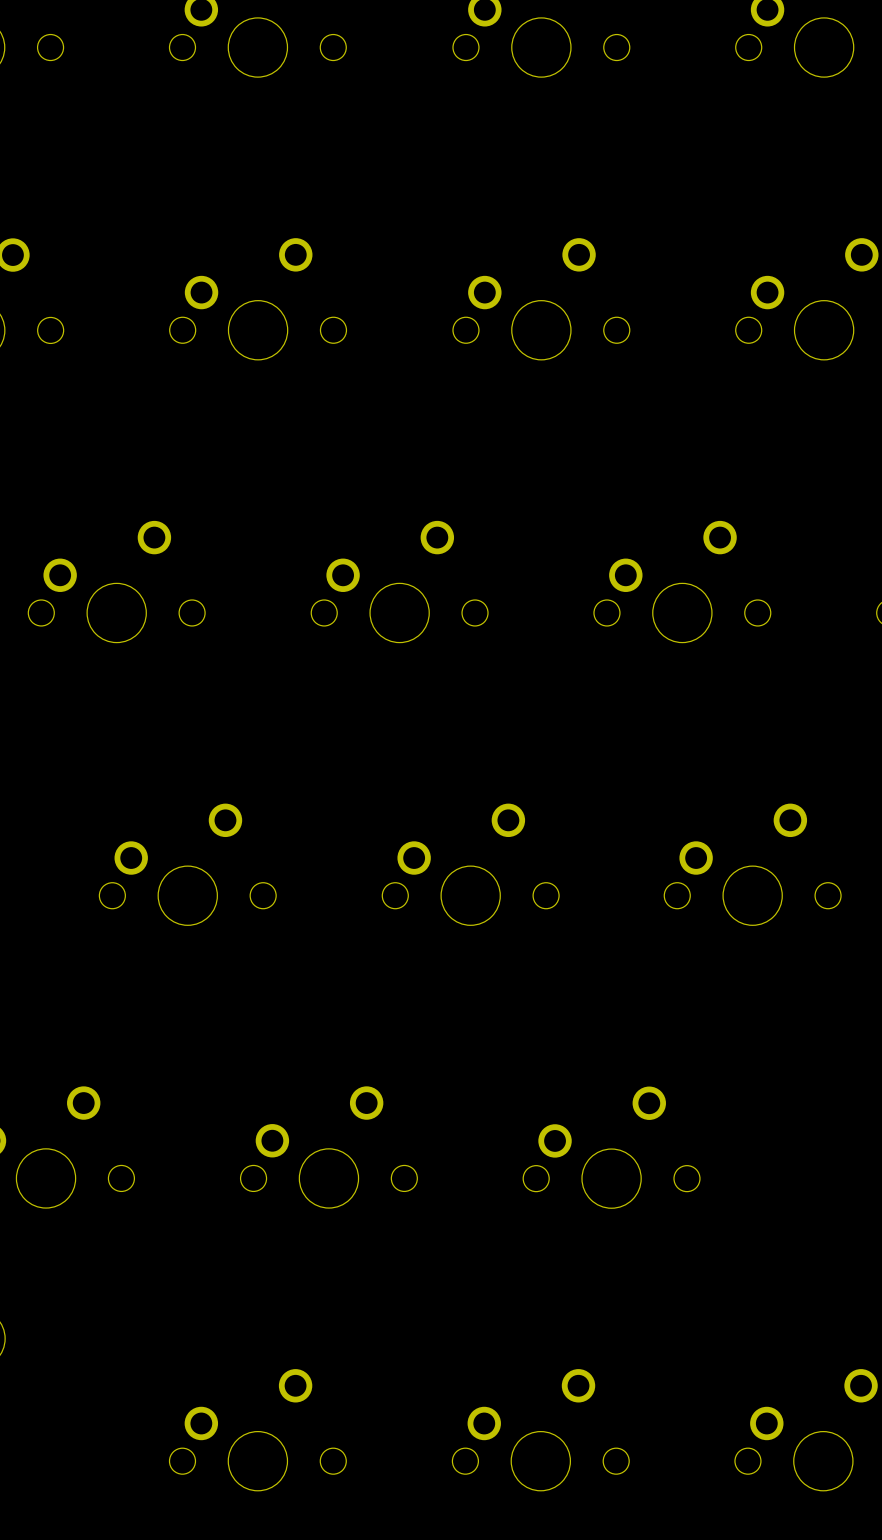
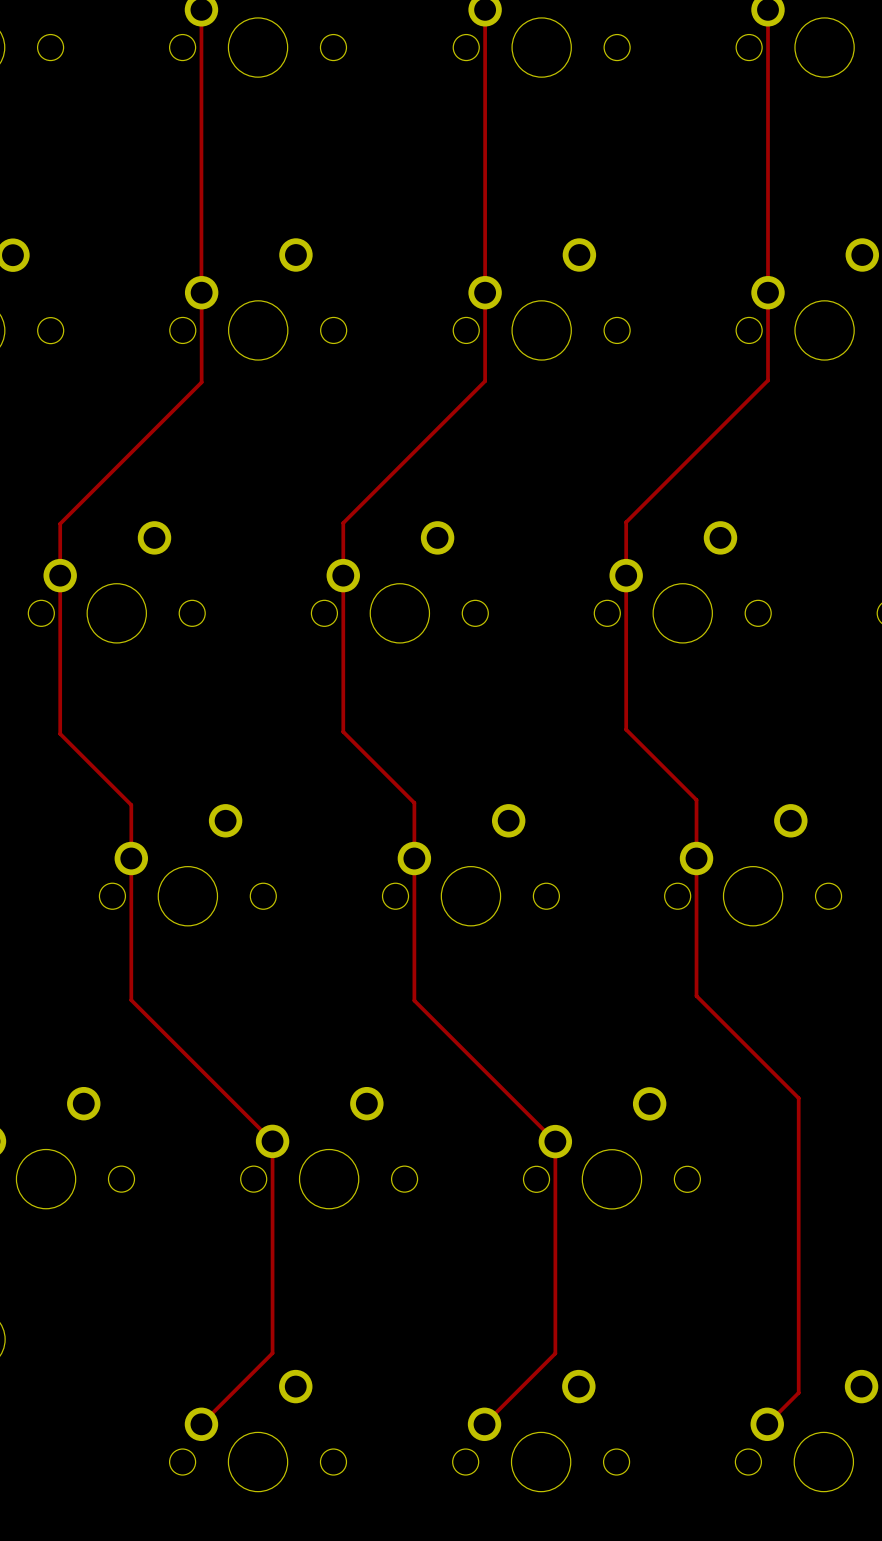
track: none -> (201, 9) (201, 292)
track: none -> (485, 9) (485, 381) (343, 523) (343, 731) (414, 802) (414, 1000) (555, 1141) (555, 1353) (484, 1424)
track: none -> (768, 9) (768, 380) (626, 522) (626, 729) (696, 799) (696, 996) (798, 1098) (798, 1392) (767, 1424)
track: none -> (201, 292) (201, 382) (60, 523) (60, 733) (131, 805) (131, 1000) (272, 1141) (272, 1353) (201, 1424)

